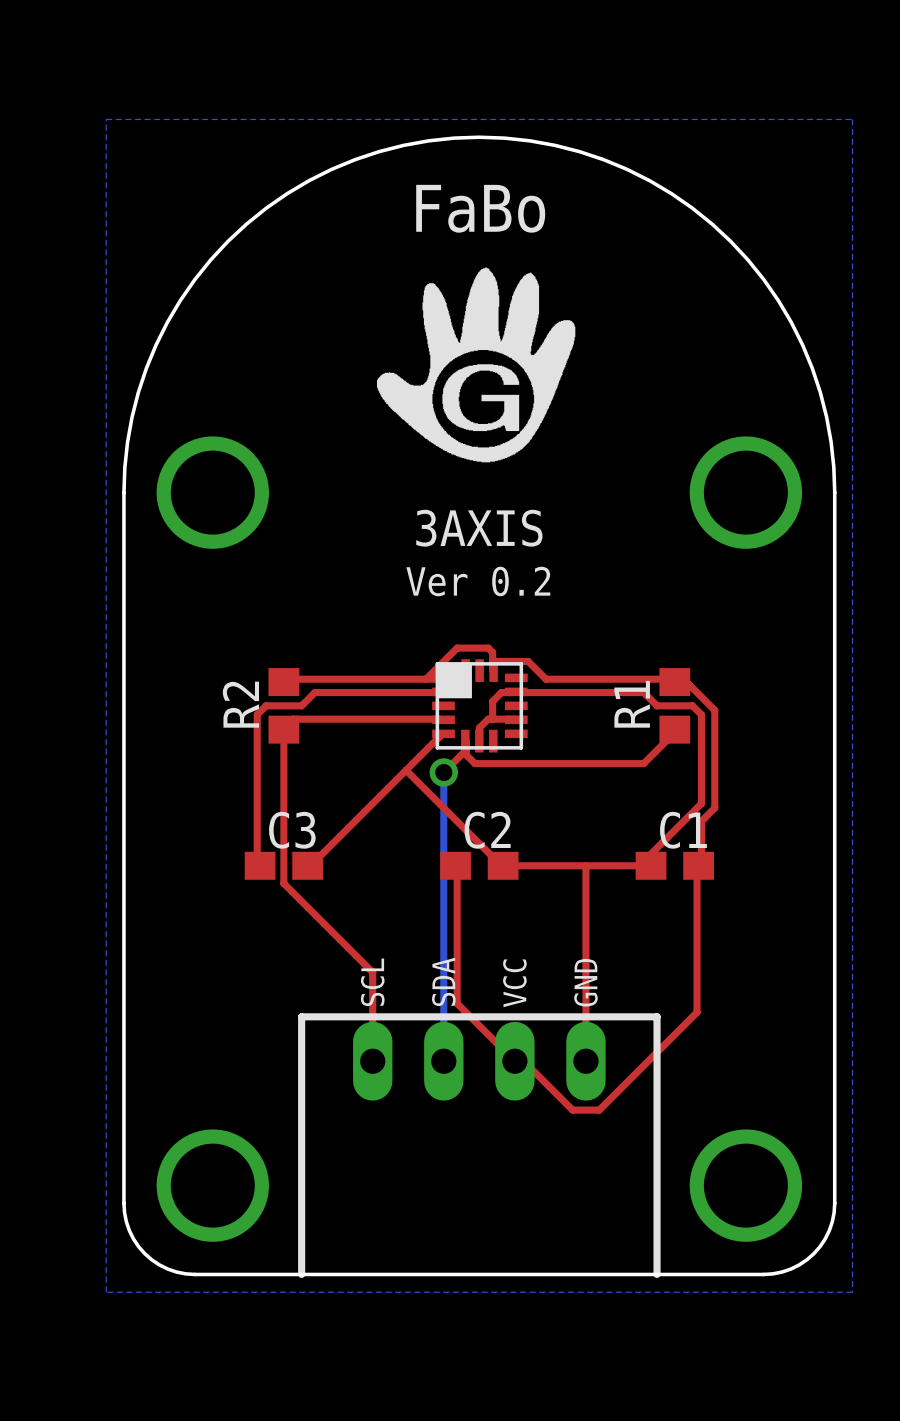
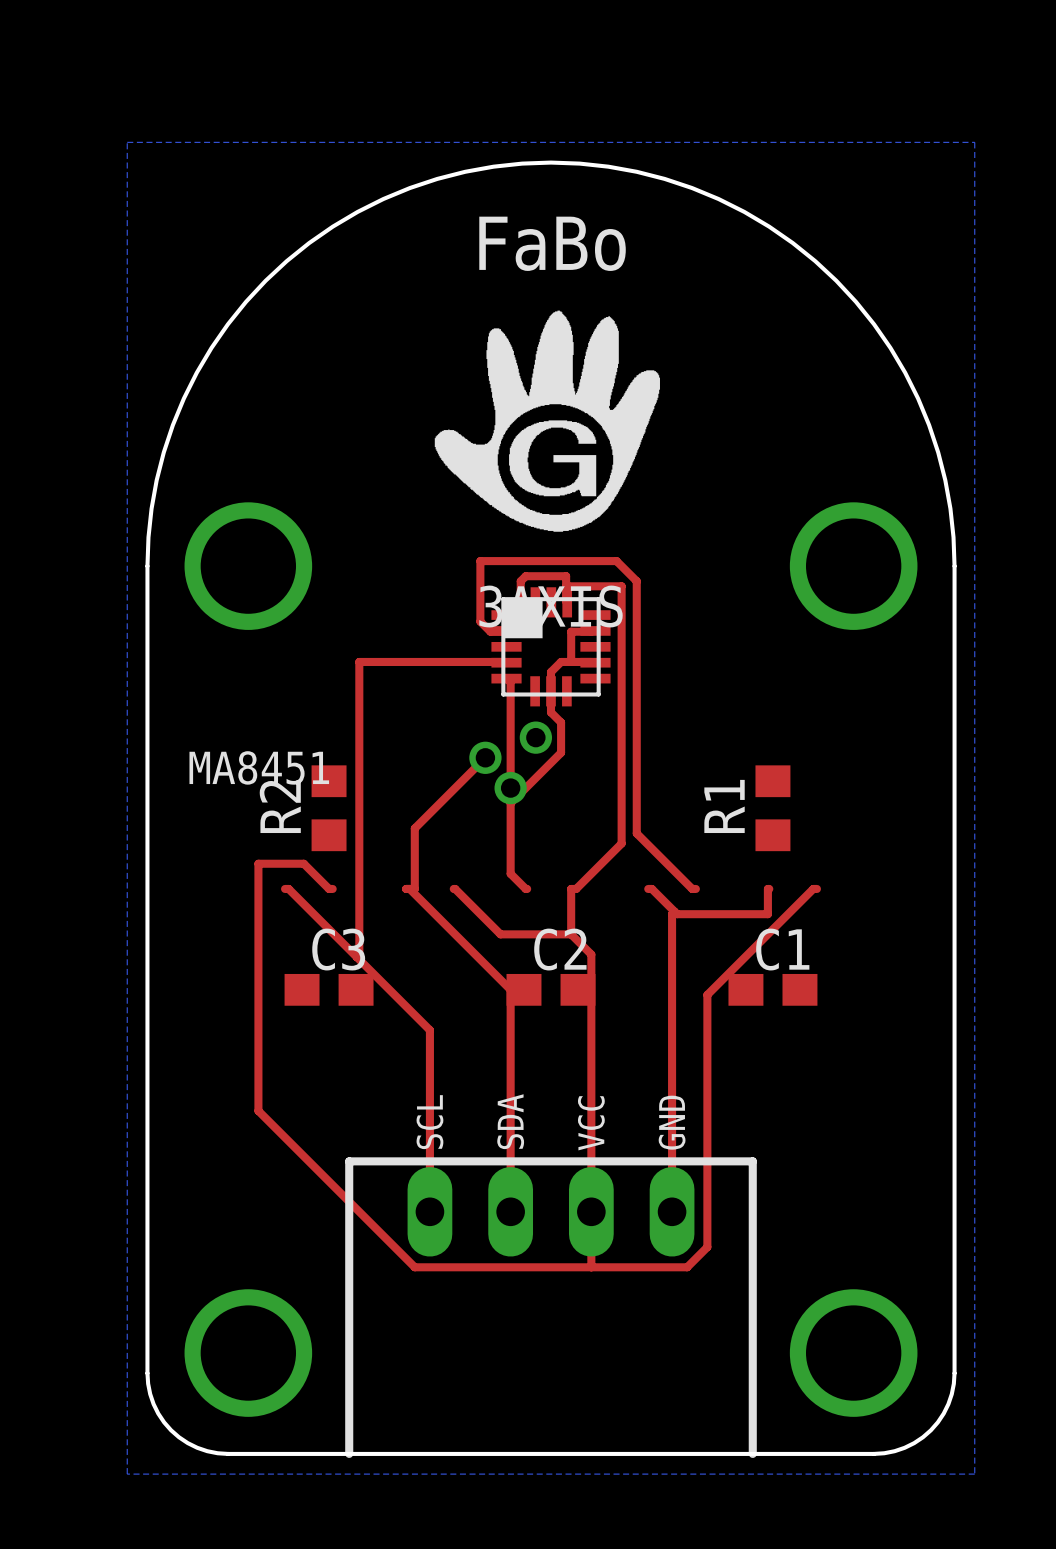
top track: none -> (566, 586) (621, 586) (621, 843) (576, 888) (571, 888) (571, 934)
top track: none -> (567, 602) (566, 576) (525, 576) (520, 581) (520, 601) (506, 615)
top track: none -> (506, 630) (490, 631) (480, 621) (480, 561) (616, 561) (636, 581) (636, 833) (692, 888) (695, 888)
top track: none -> (595, 630) (571, 631) (571, 661)
part: none -> (551, 646)
top track: none -> (506, 662) (359, 661) (359, 954) (356, 957)
top track: none -> (595, 662) (561, 661) (551, 672) (551, 712) (561, 722) (561, 752) (510, 803)
text: Ver 0.2 (478, 581) -> none
top track: none -> (506, 678) (510, 682) (510, 873) (527, 888)
via: none -> (535, 737)
top track: none -> (485, 757) (414, 828) (414, 888) (406, 888)
via: none -> (485, 757)
text: none -> MA8451 (259, 767)
top track: (443, 677) (283, 679) (283, 682) -> none
top track: (426, 679) (457, 648) (488, 648) (492, 652) (492, 670) (493, 670) (492, 661) (528, 661) (545, 679) (674, 679) (674, 683) (688, 683) (714, 710) (714, 808) (701, 821) (701, 865) (697, 865) (697, 1012) (617, 1092) -> (816, 888) (813, 888) (707, 994) (707, 1247)
via: none -> (510, 788)
top track: (443, 691) (314, 692) (301, 705) (266, 705) (257, 714) (257, 865) (260, 865) -> none
part: (479, 705) -> none
top track: (443, 719) (292, 719) (283, 728) (283, 883) (372, 972) -> (285, 888) (288, 888) (429, 1030) (429, 1110)
top track: (492, 719) (492, 701) (501, 692) (516, 691) (643, 692) (657, 705) (692, 705) (701, 714) (701, 803) (639, 865) -> none
top track: (516, 719) (488, 719) (479, 728) (479, 741) -> none
top track: (674, 729) (674, 732) (643, 763) (474, 763) (466, 754) (466, 741) (465, 741) (466, 750) (443, 772) -> none
top track: (443, 733) (310, 865) (307, 865) -> none
top track: (406, 770) (501, 865) (651, 865) -> none
bottom track: (443, 772) (443, 1061) -> none
via: (443, 772) -> none
top track: none -> (409, 888) (510, 989) (510, 1211)
top track: none -> (453, 888) (500, 934) (571, 934)
top track: none -> (648, 888) (651, 888) (677, 914) (767, 914) (769, 888)
top track: none -> (674, 911) (672, 914) (672, 989)
top track: none -> (571, 934) (591, 954) (591, 1267)
top track: (455, 865) (457, 865) (457, 1003) (514, 1061) (523, 1061) (572, 1110) -> (332, 888) (329, 888) (303, 863) (258, 863) (258, 1110) (414, 1267) (656, 1267)

